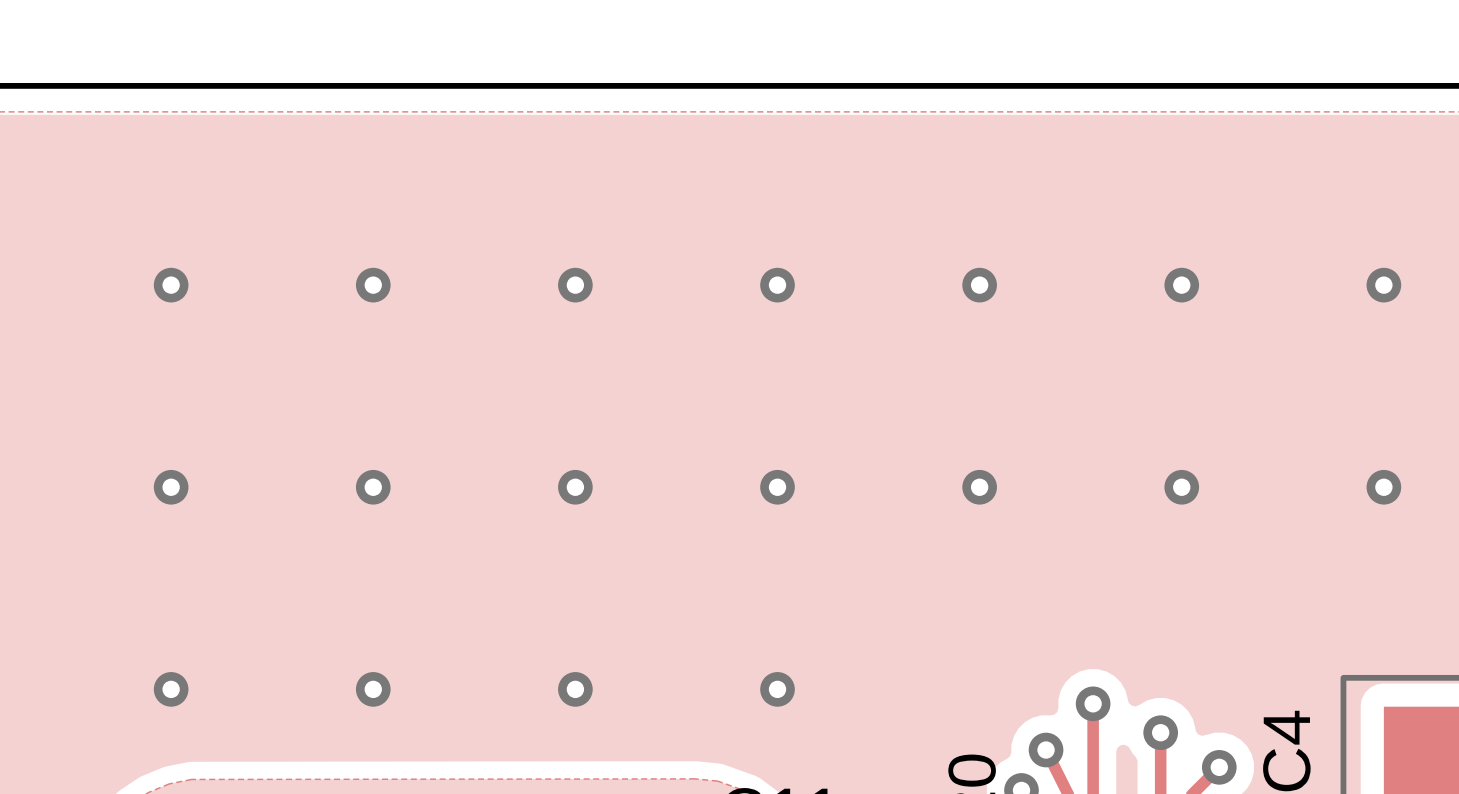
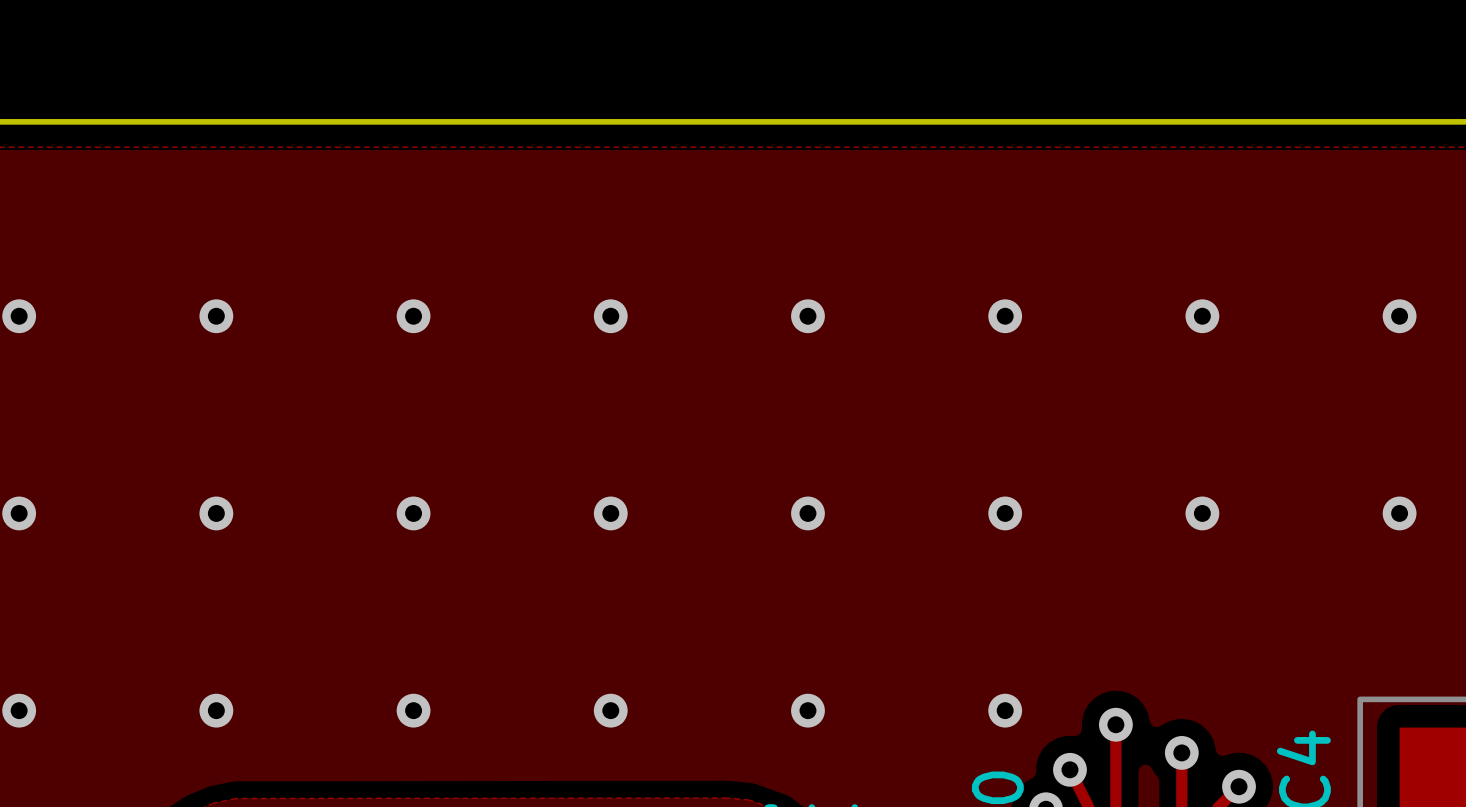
via: none -> (1005, 710)

